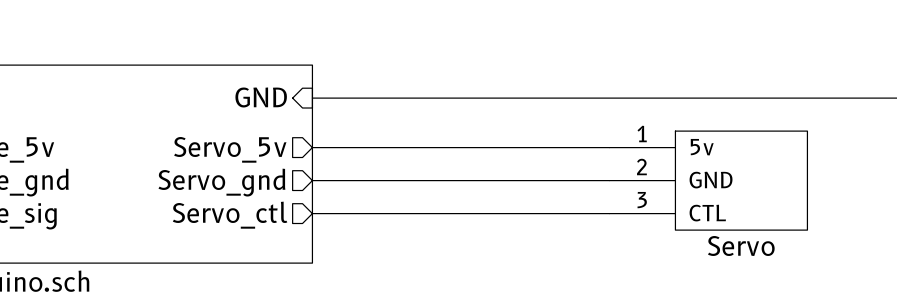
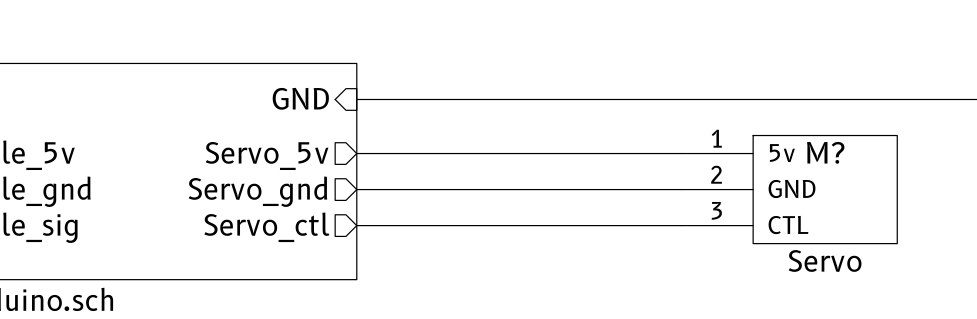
M? name: none -> M? (825, 152)

